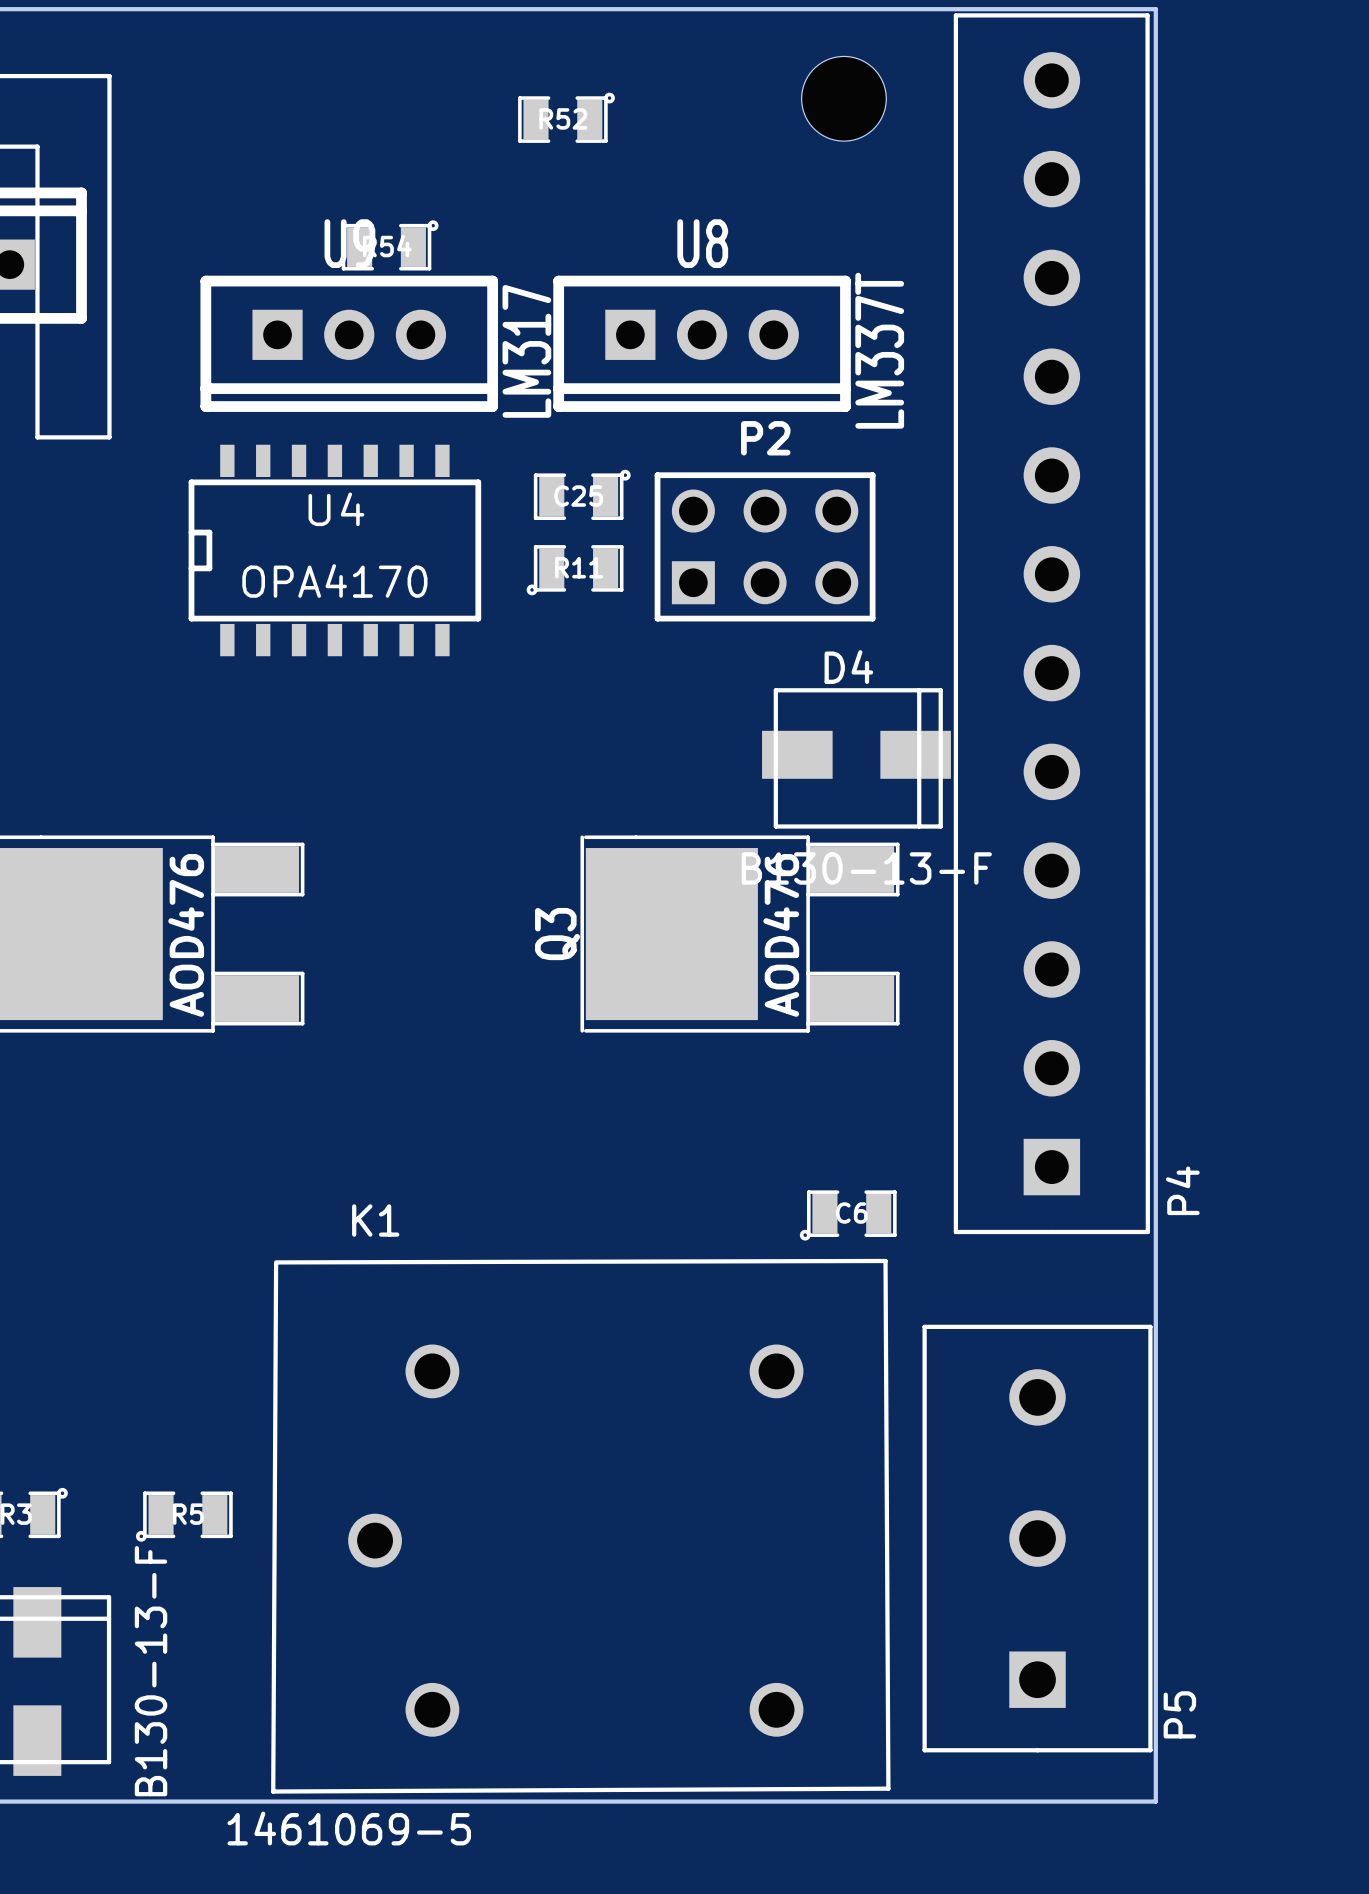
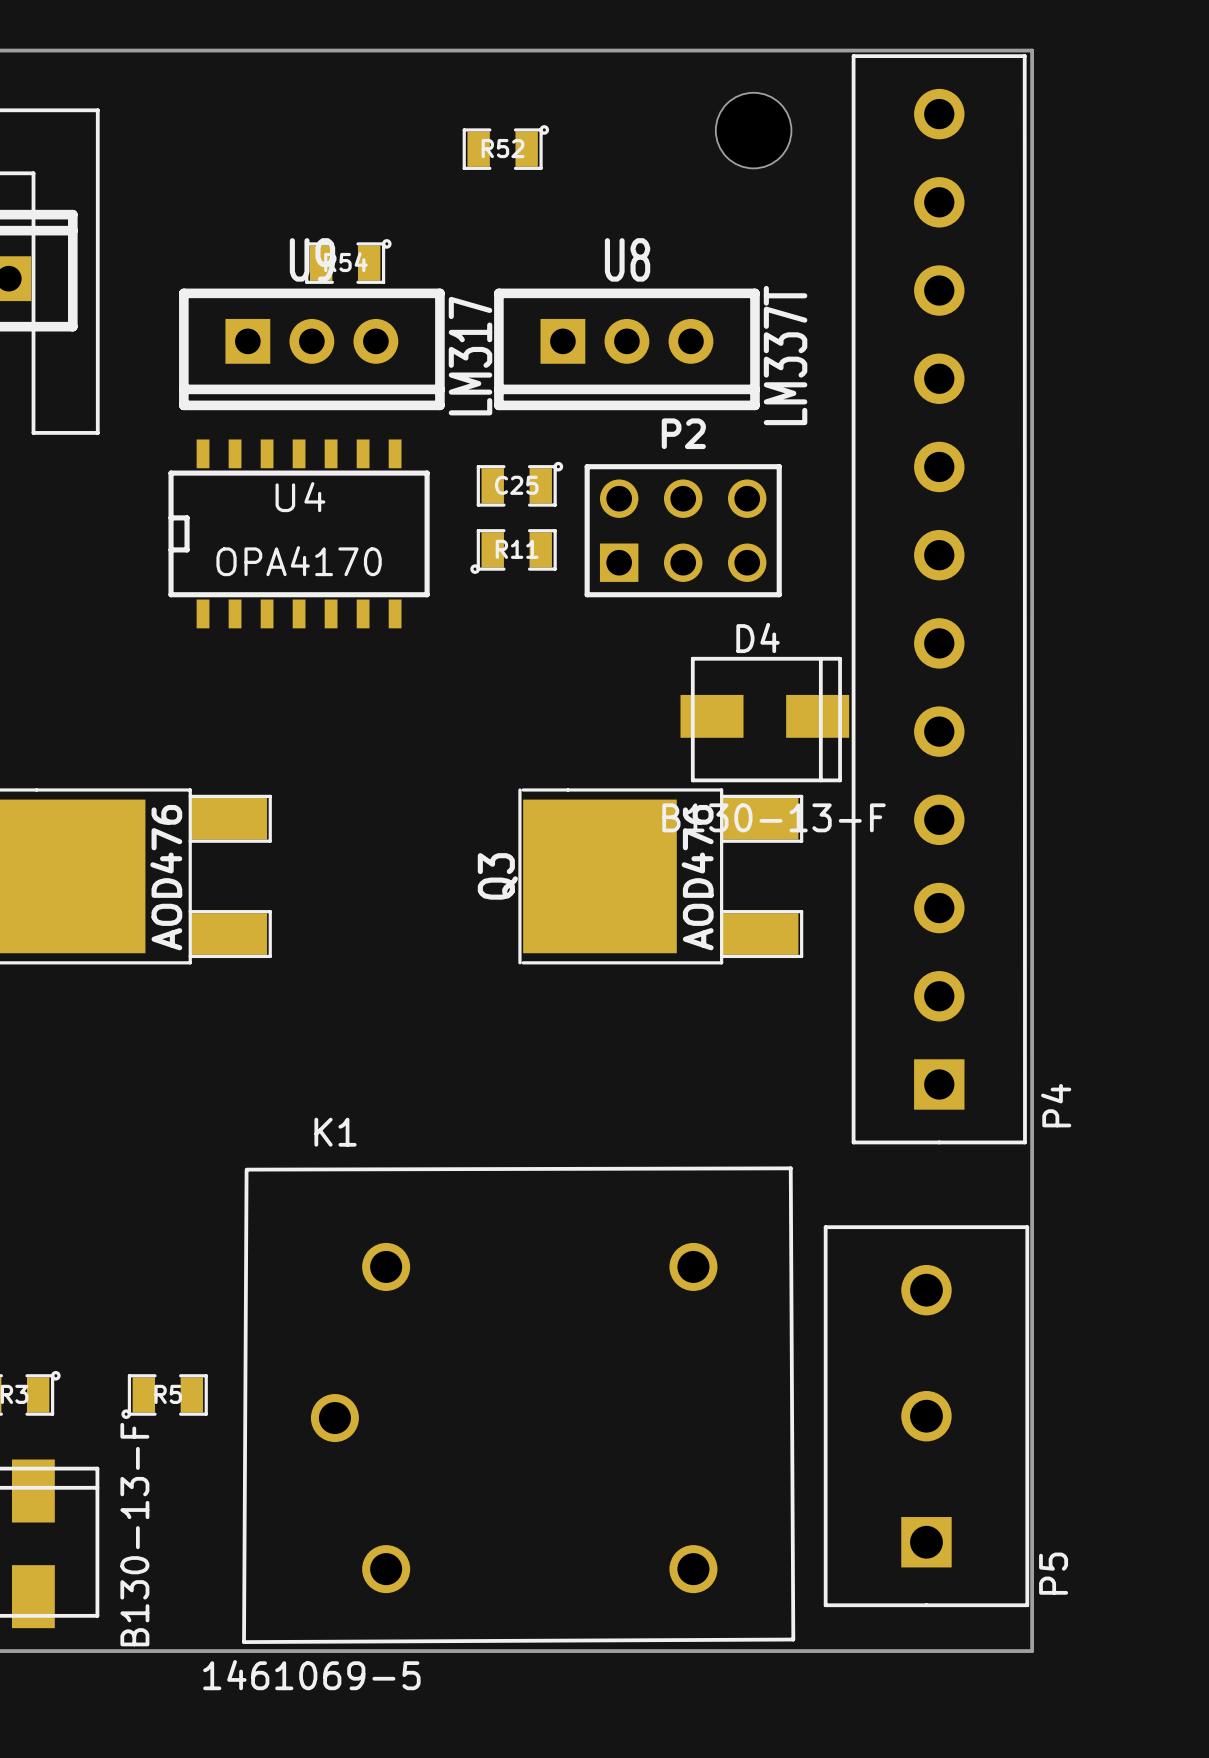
C6: (848, 1215) -> none

